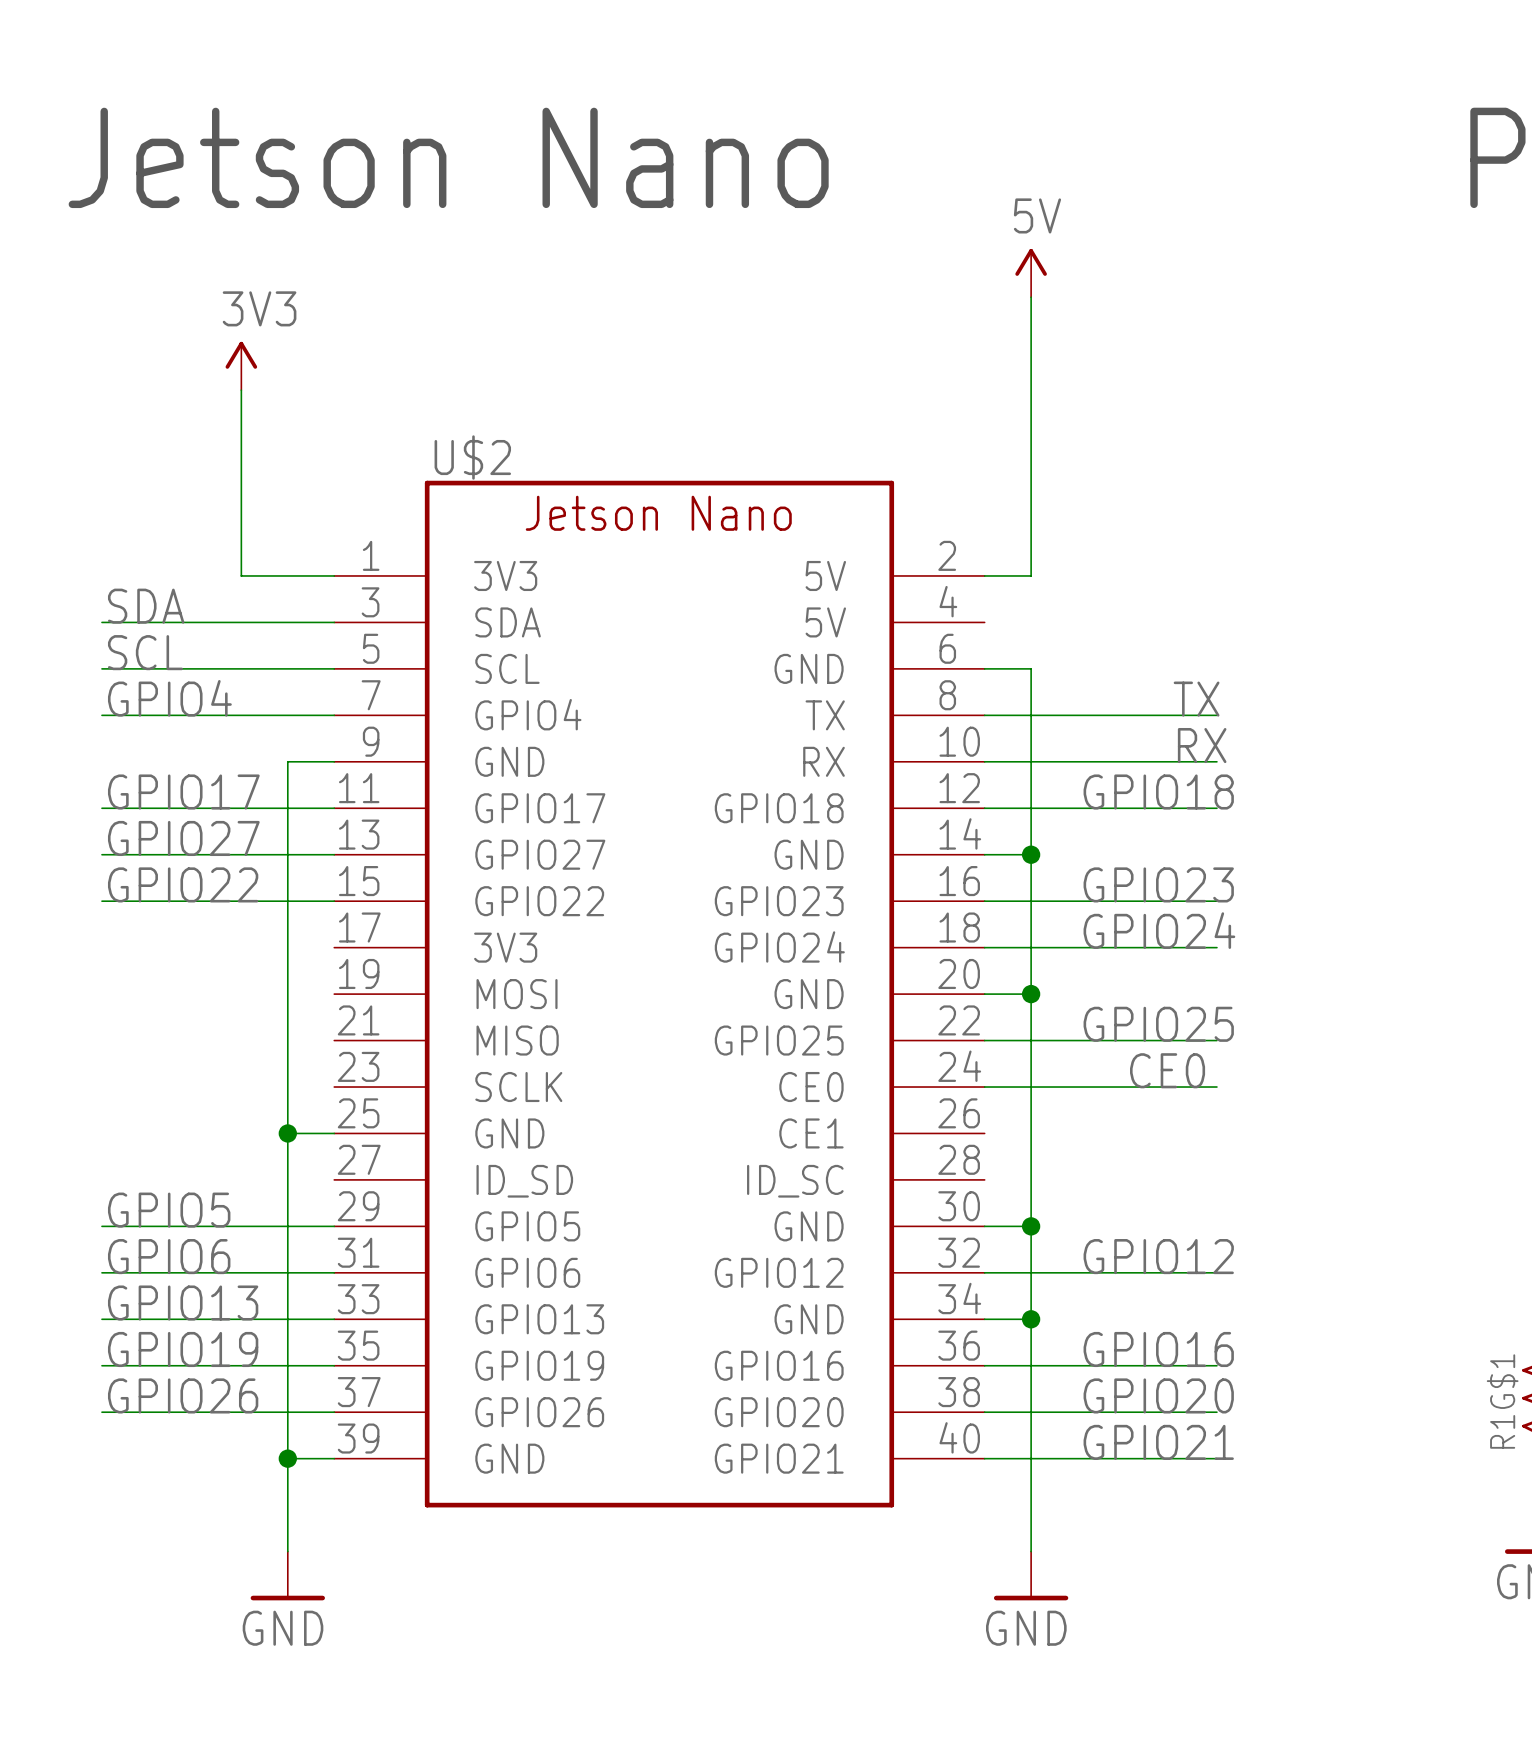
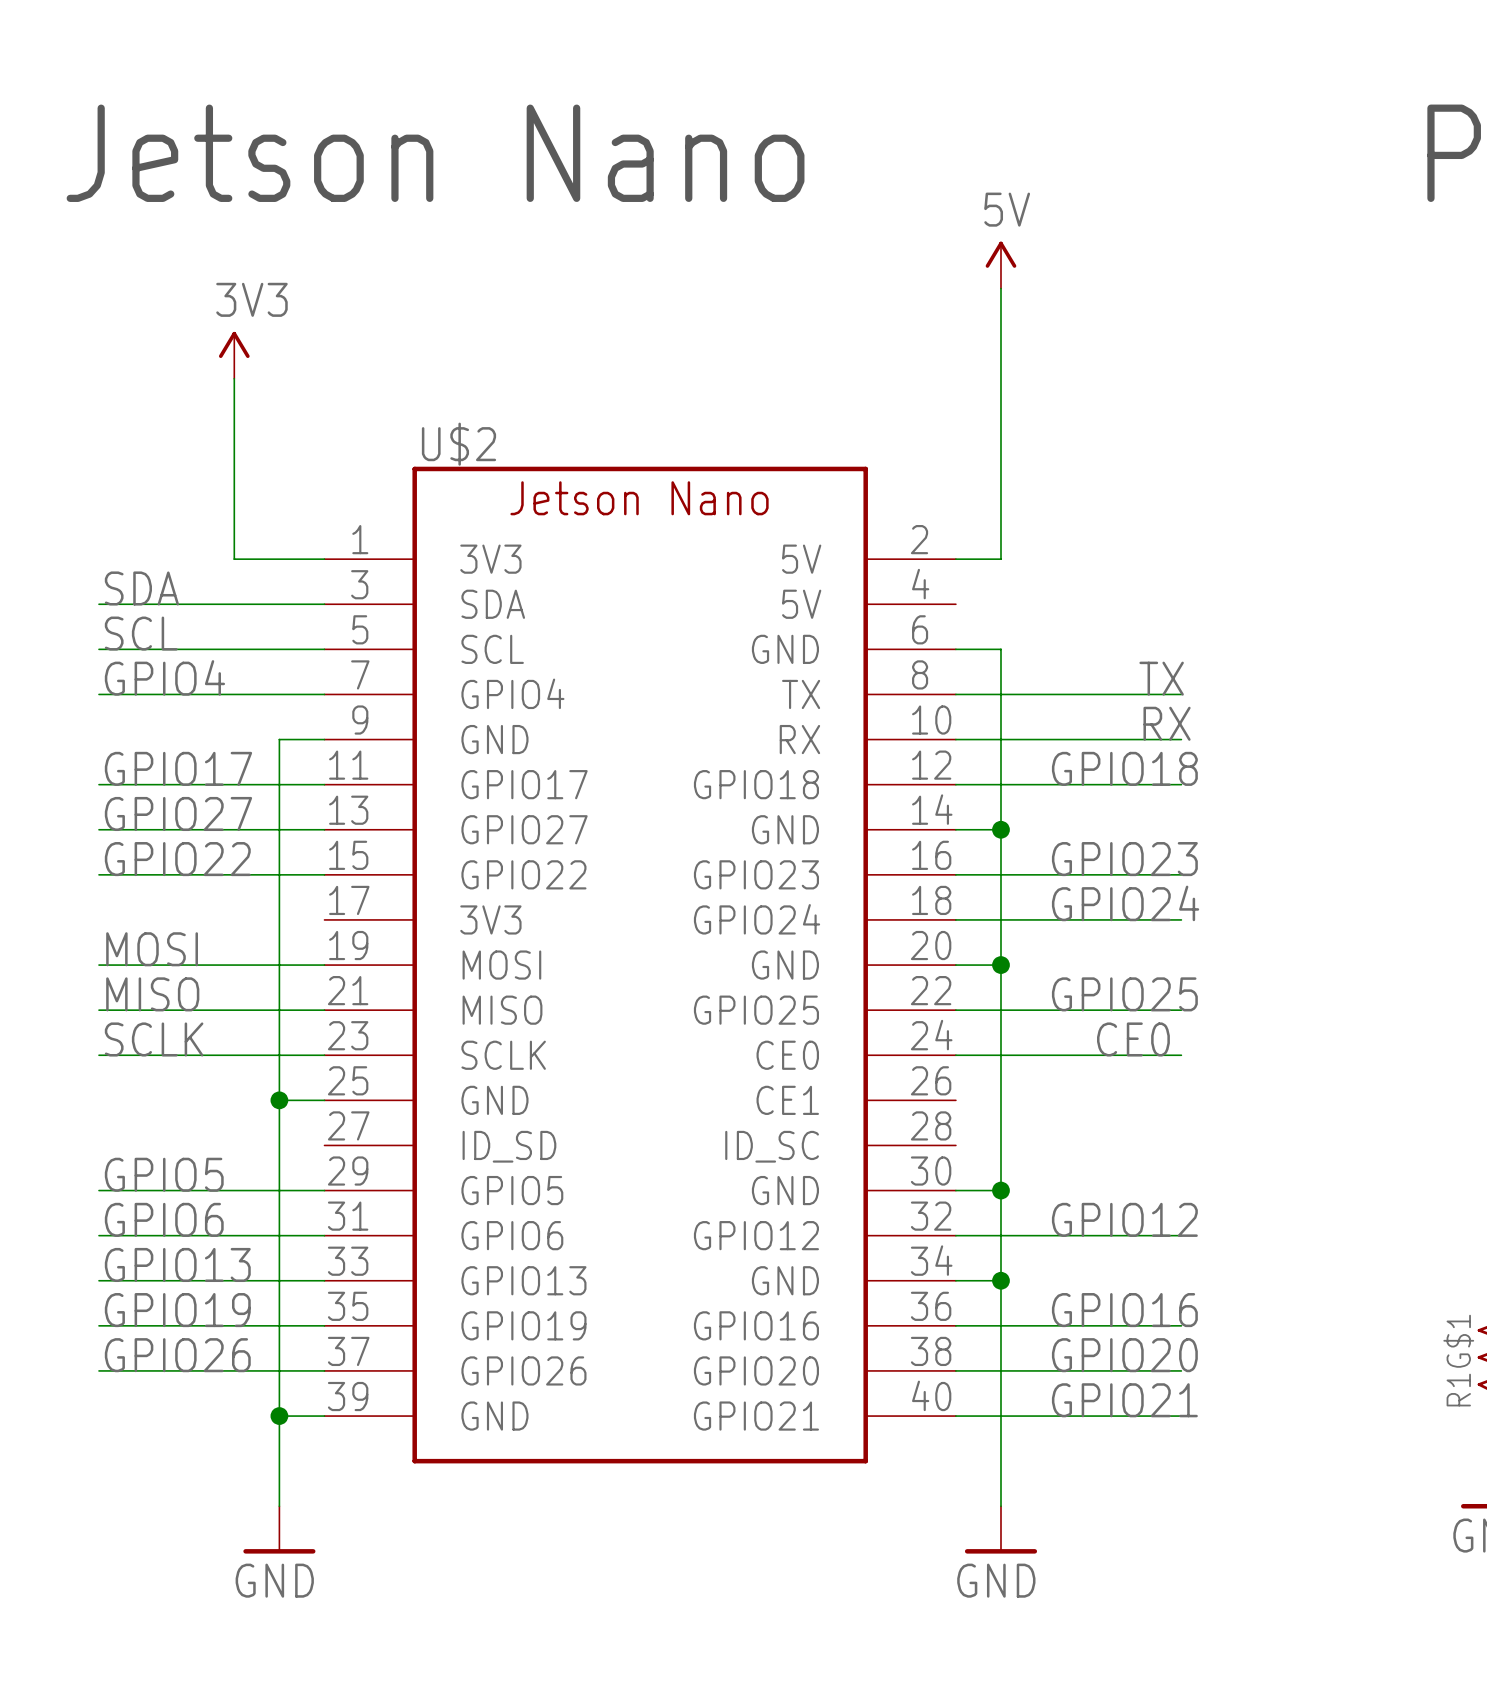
label: none -> MOSI (152, 949)
wire: none -> (99, 965) (324, 965)
label: none -> MISO (152, 994)
wire: none -> (99, 1010) (324, 1010)
label: none -> SCLK (154, 1039)
wire: none -> (99, 1055) (324, 1055)

